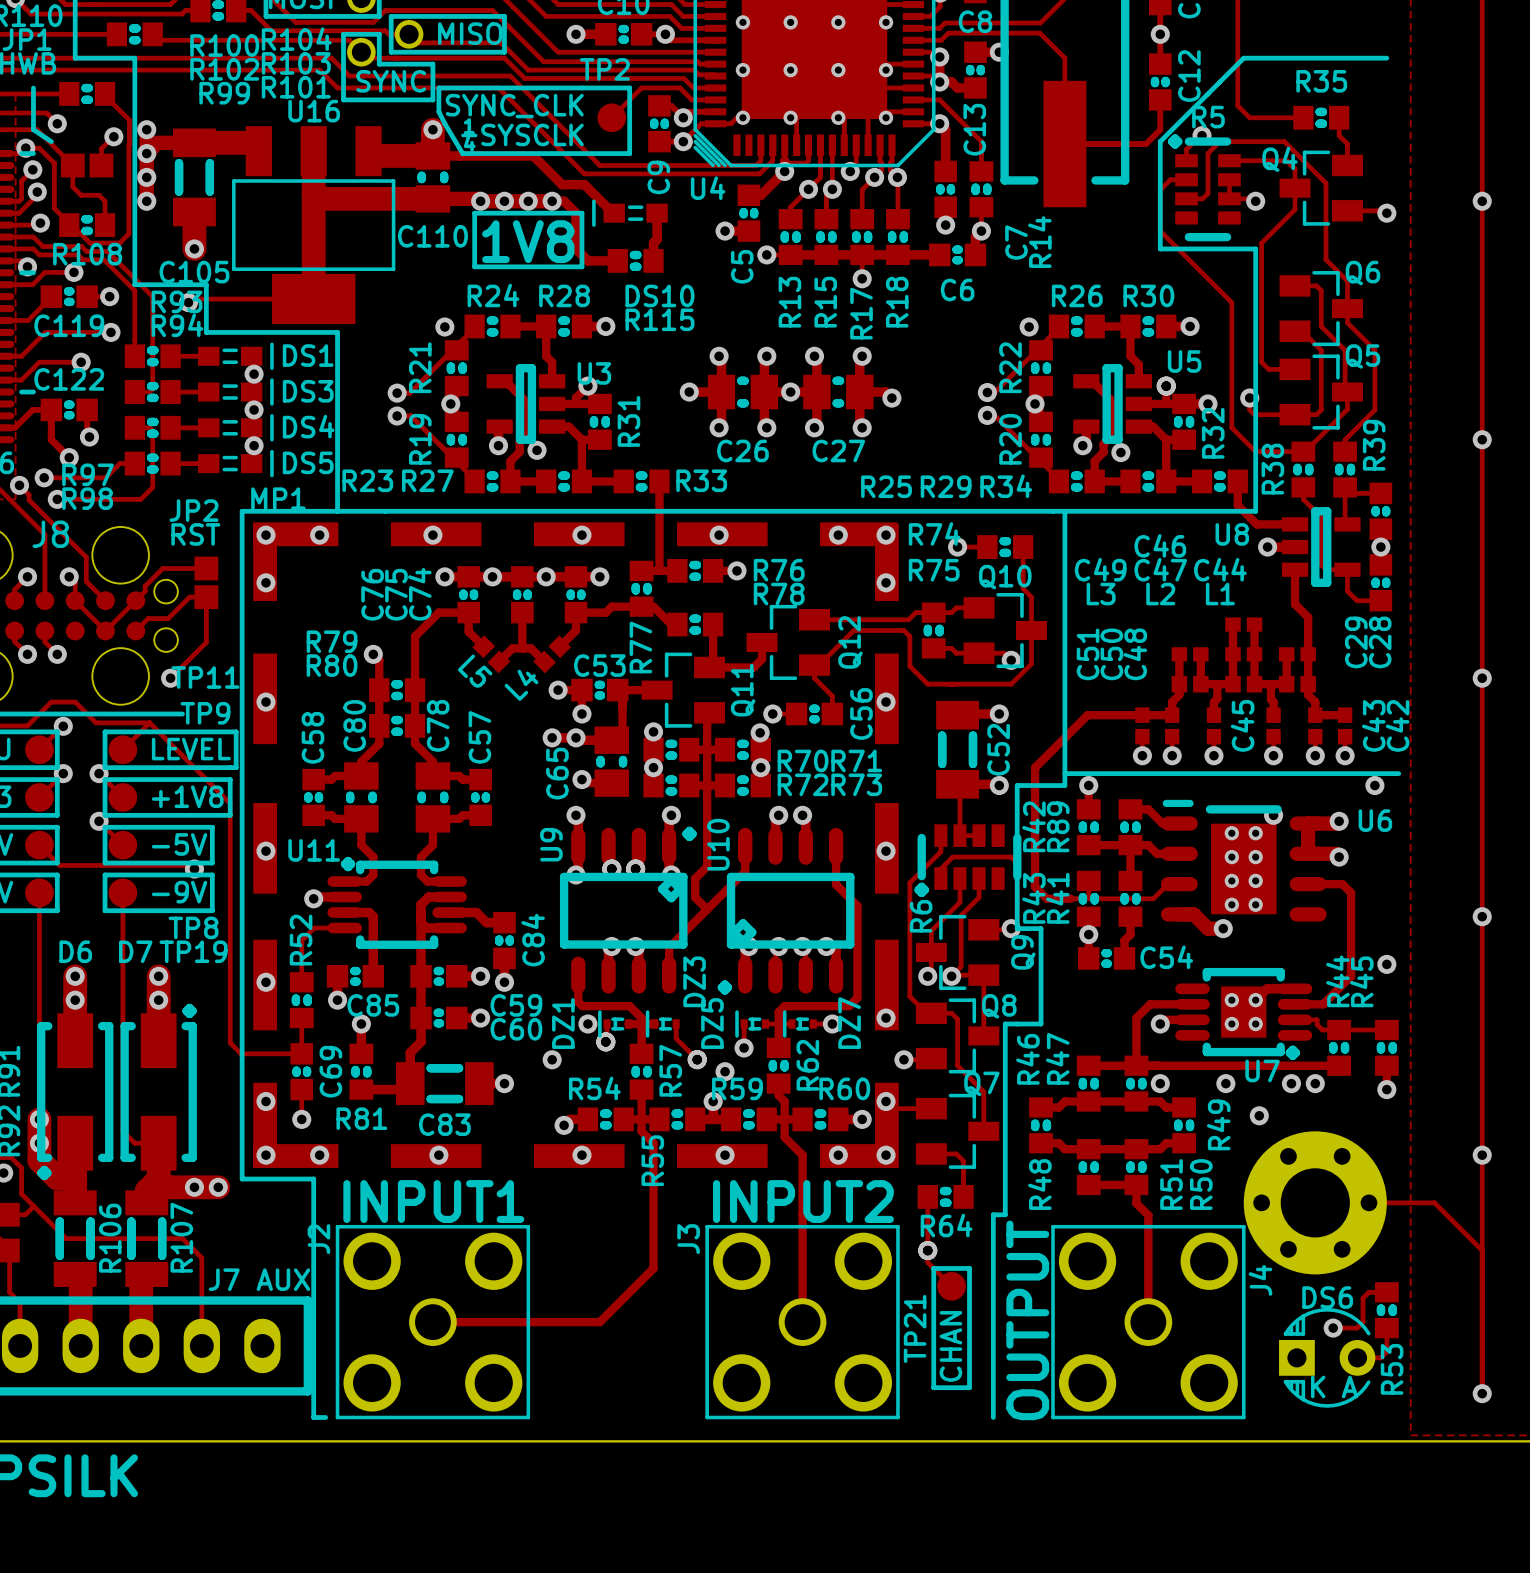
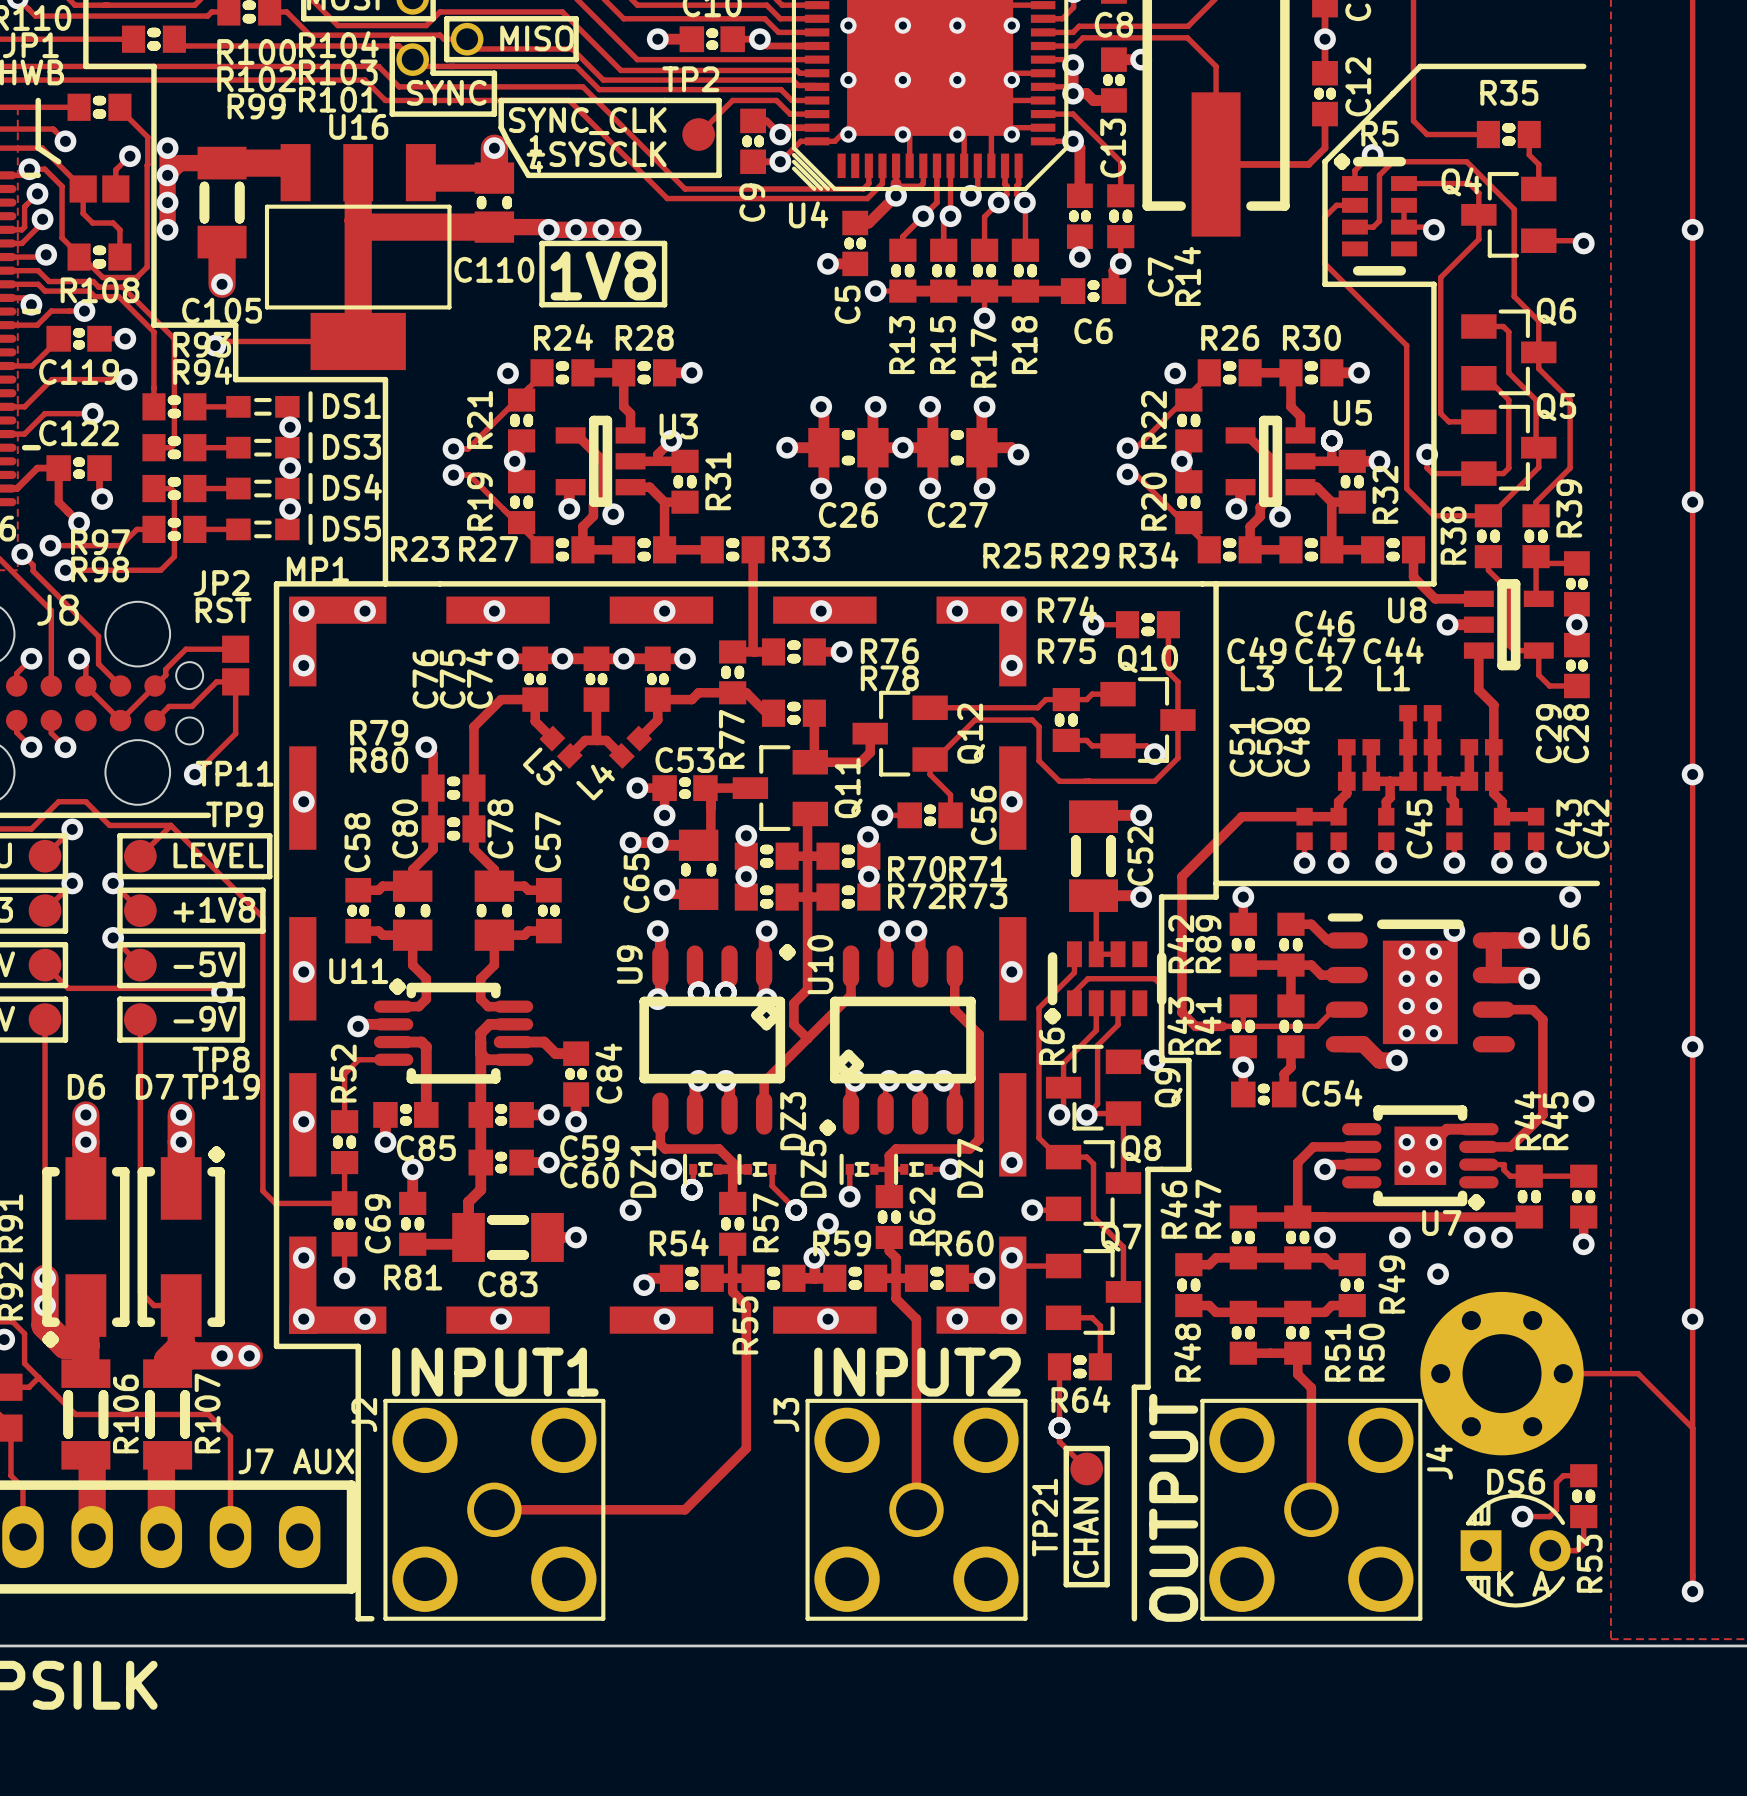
track: (432, 155) (533, 155) (562, 184) (584, 184) (614, 213) -> none
track: (552, 201) (564, 201) (576, 213) (576, 248) (587, 260) (617, 260) -> none
DS10: (629, 213) -> none
track: (657, 213) (657, 239) (653, 242) (653, 260) -> none
R115: (635, 260) -> none

